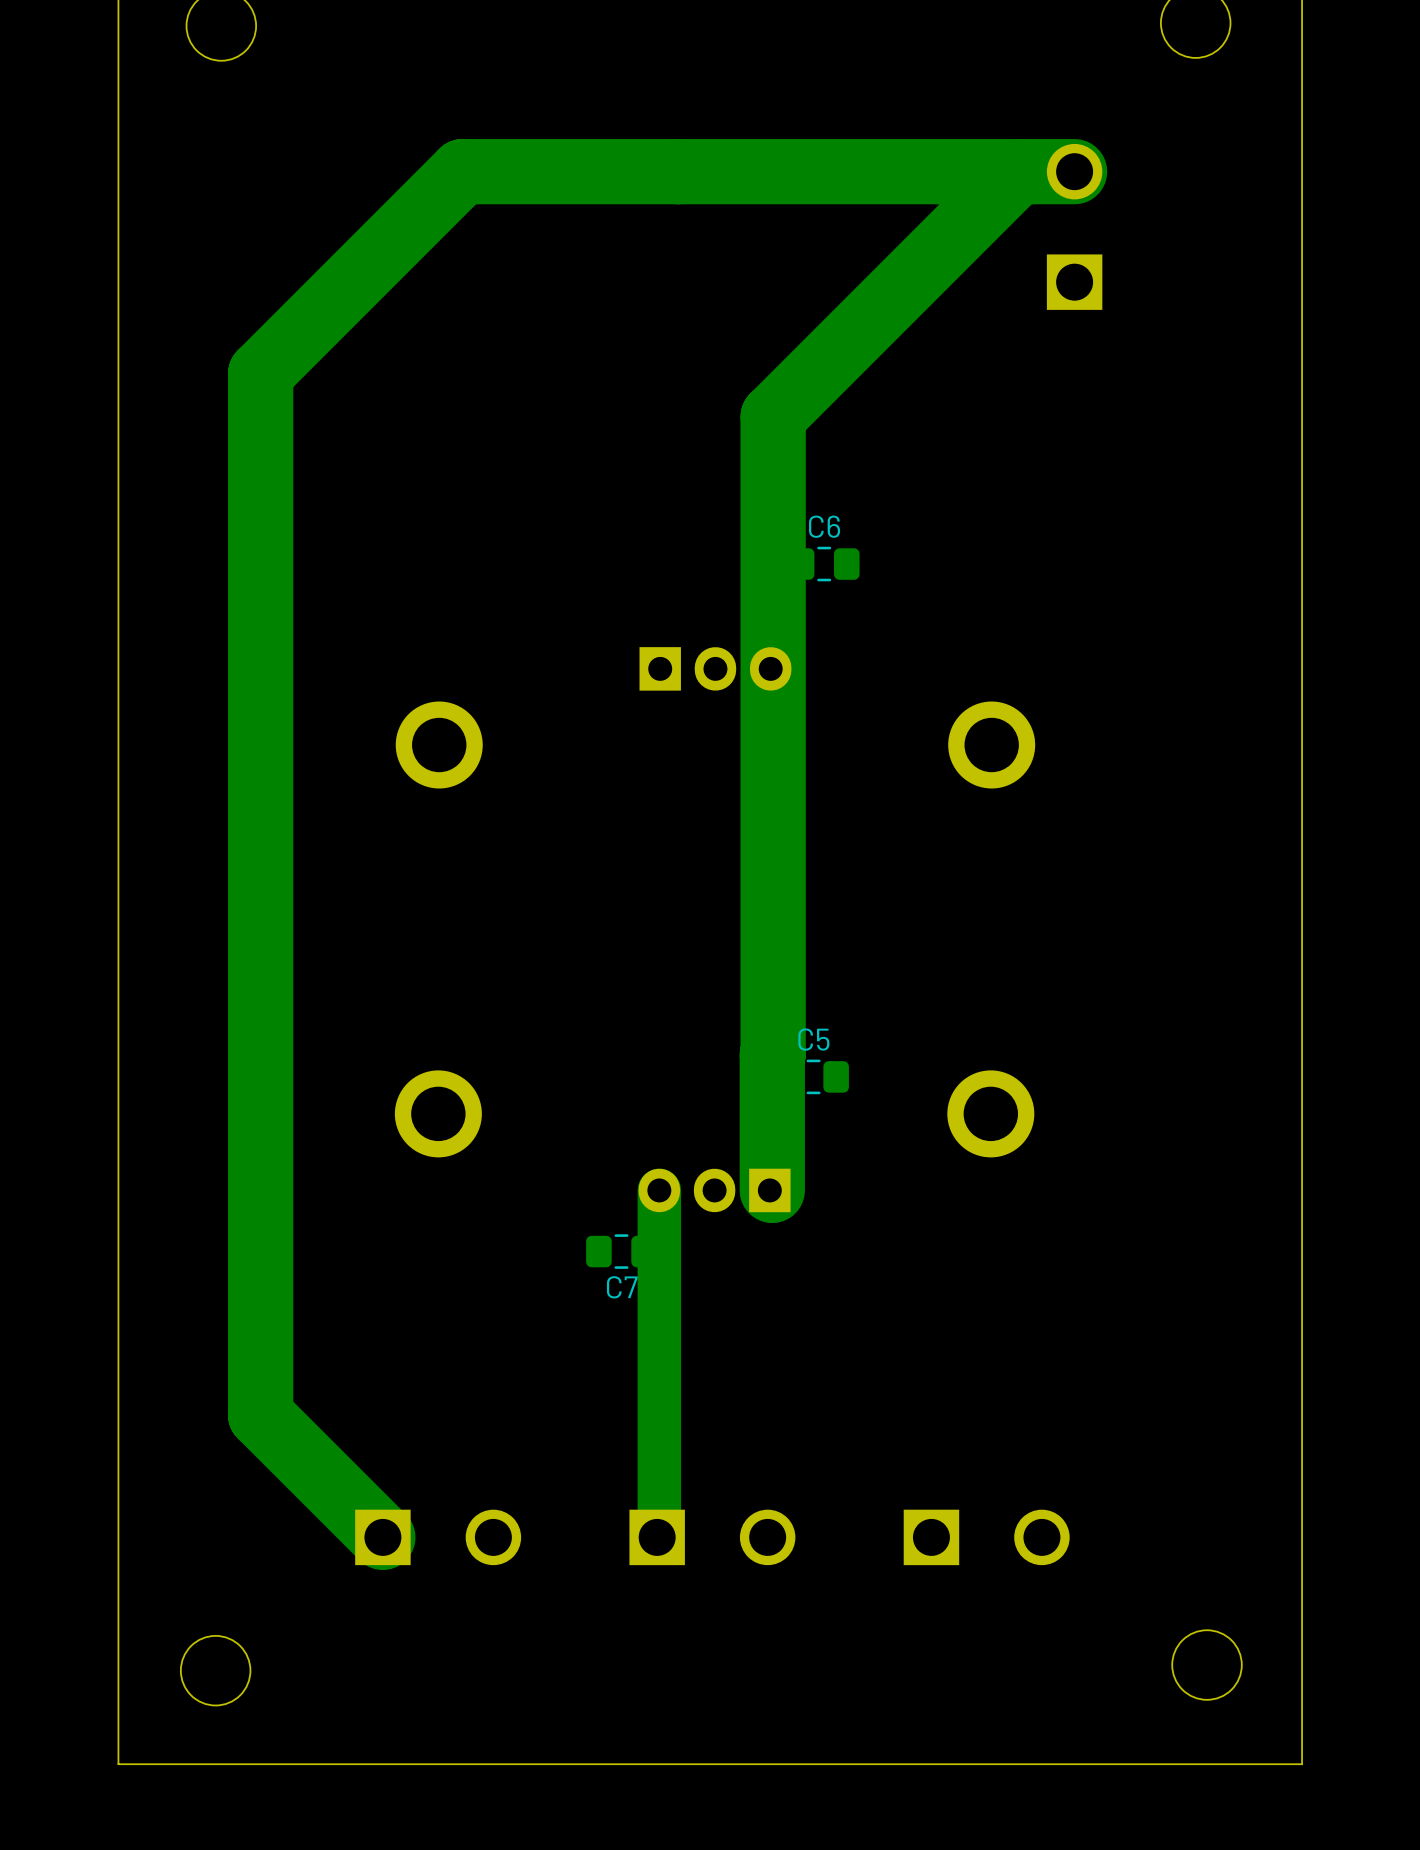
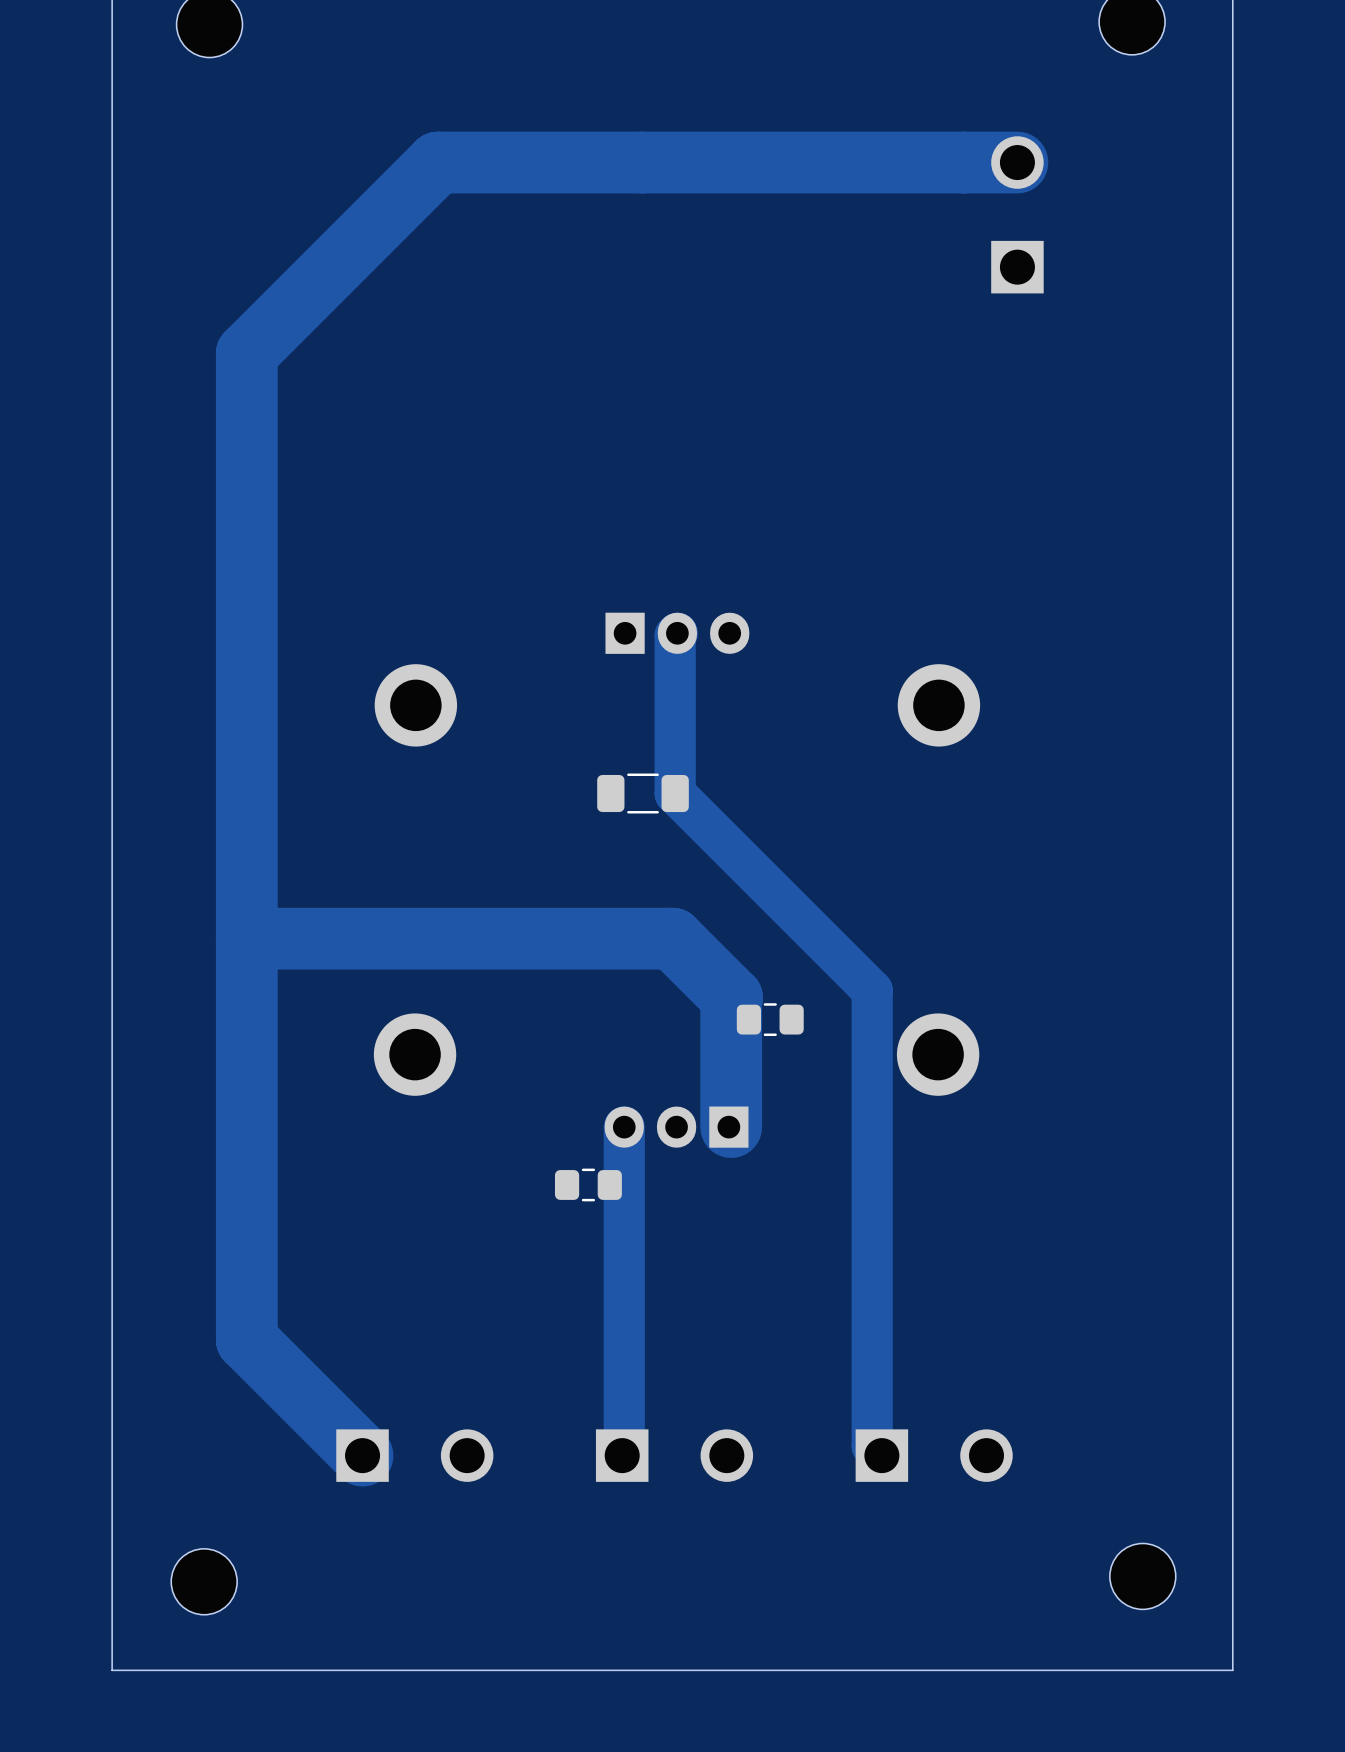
track: (1018, 171) (773, 416) (773, 1054) -> (246, 938) (672, 938) (732, 997)
C6: (824, 564) -> none
track: none -> (677, 633) (675, 635) (675, 793) (872, 990) (872, 1445) (881, 1455)
part: none -> (643, 793)
C5 name: C5 (813, 1039) -> none
C7 name: C7 (622, 1287) -> none

